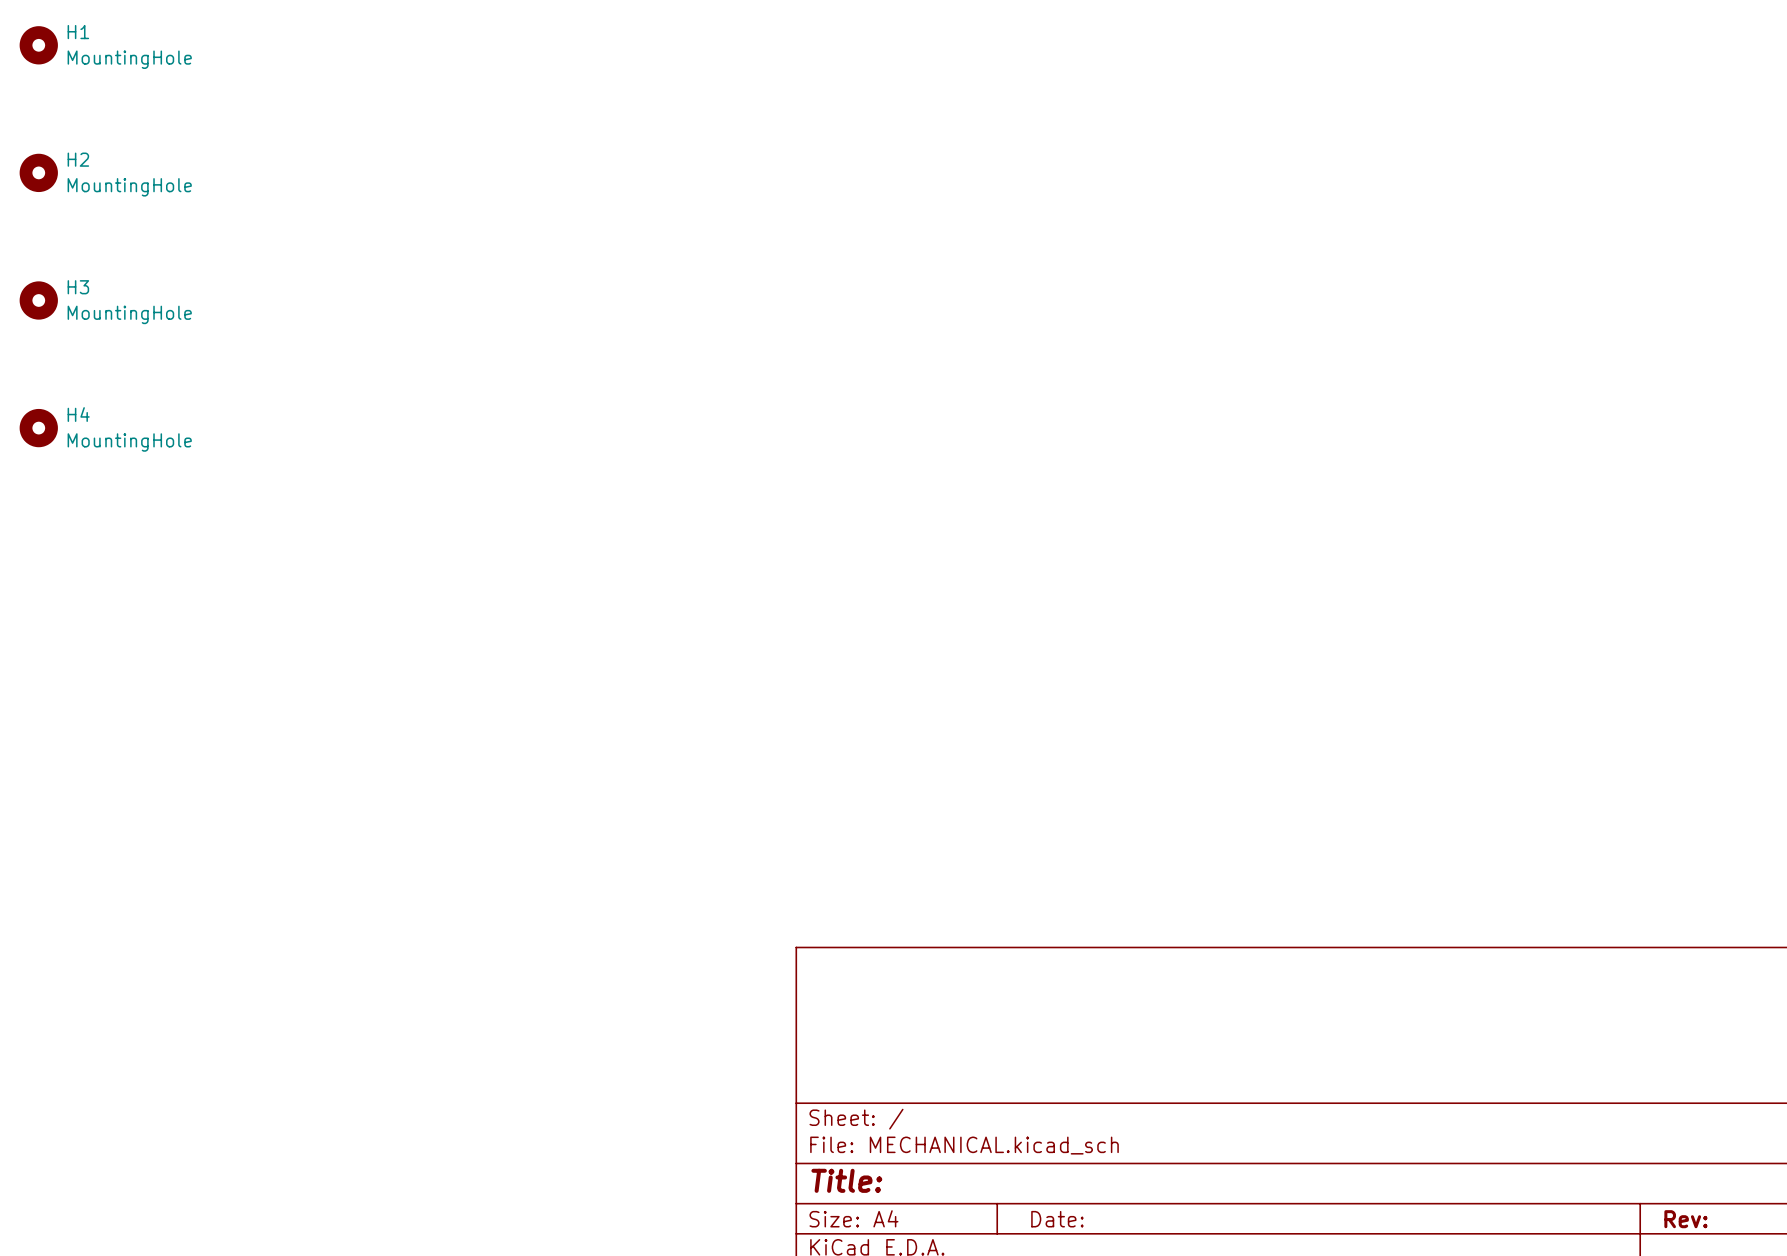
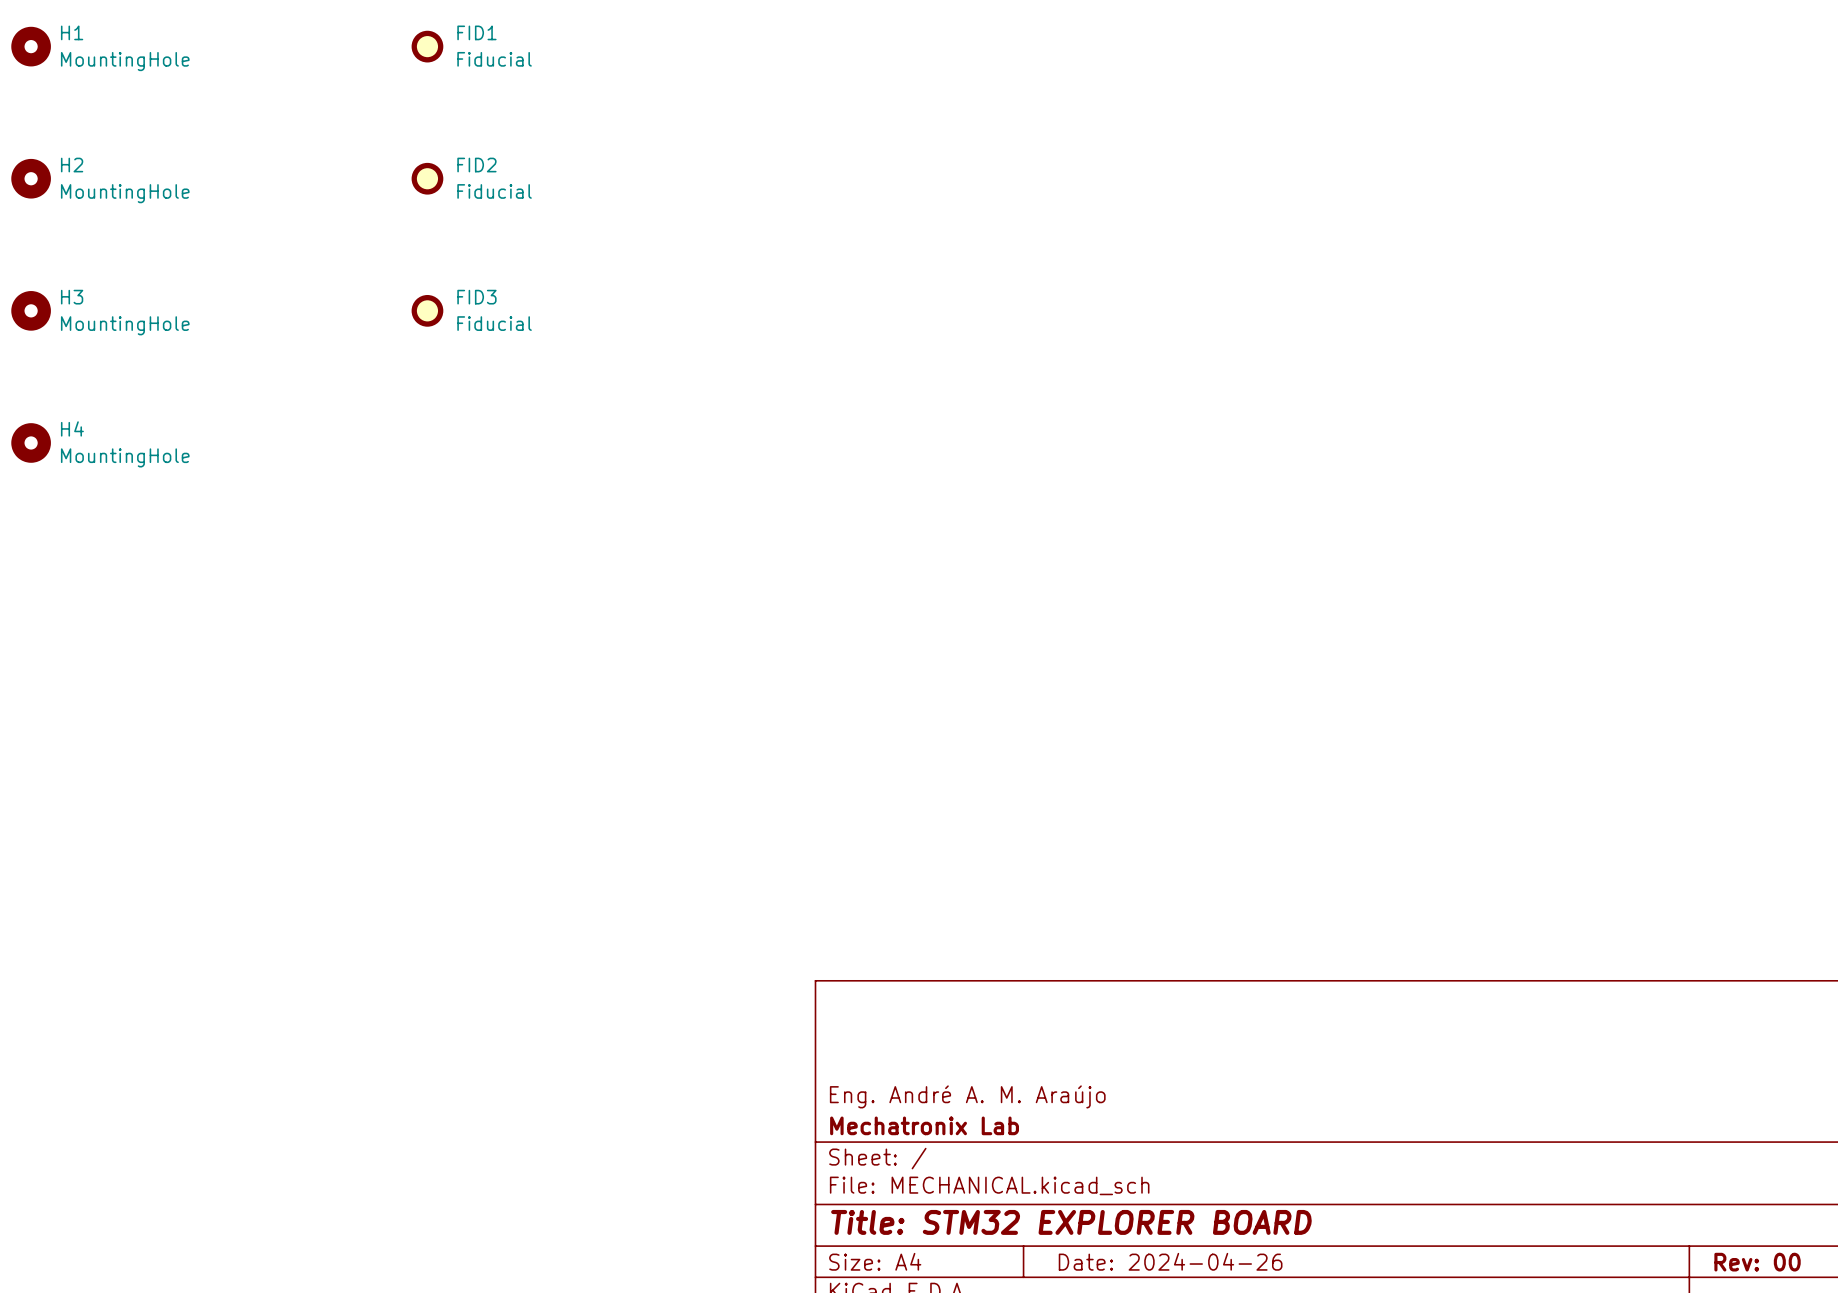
FID1: none -> Fiducial (427, 46)
FID2: none -> Fiducial (427, 178)
FID3: none -> Fiducial (427, 310)
title block: none -> Eng. André A. M. Araújo (967, 1096)
title block: none -> Mechatronix Lab (924, 1125)
title block: Title: (846, 1180) -> Title: STM32 EXPLORER BOARD (1071, 1222)
title block: Date: (1057, 1219) -> Date: 2024-04-26 (1170, 1261)
title block: Rev: (1685, 1219) -> Rev: 00 (1757, 1262)

